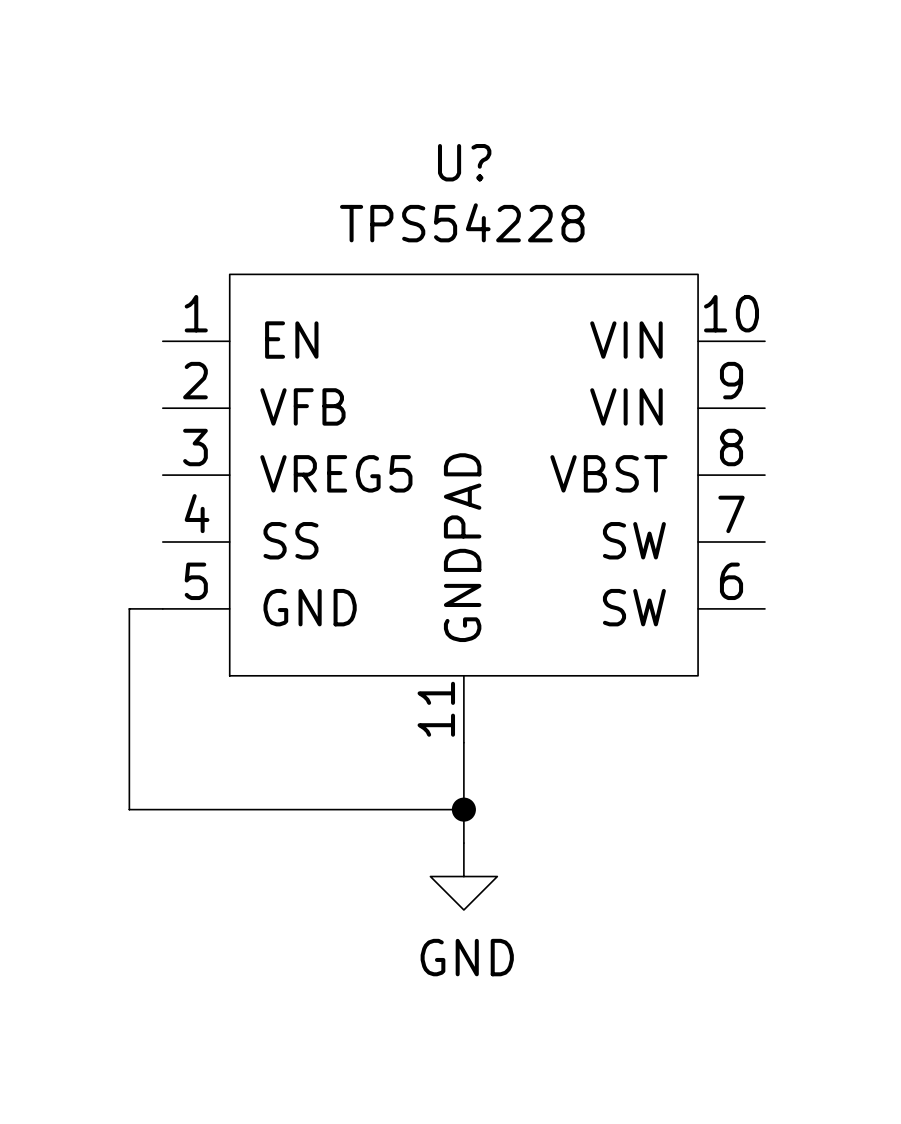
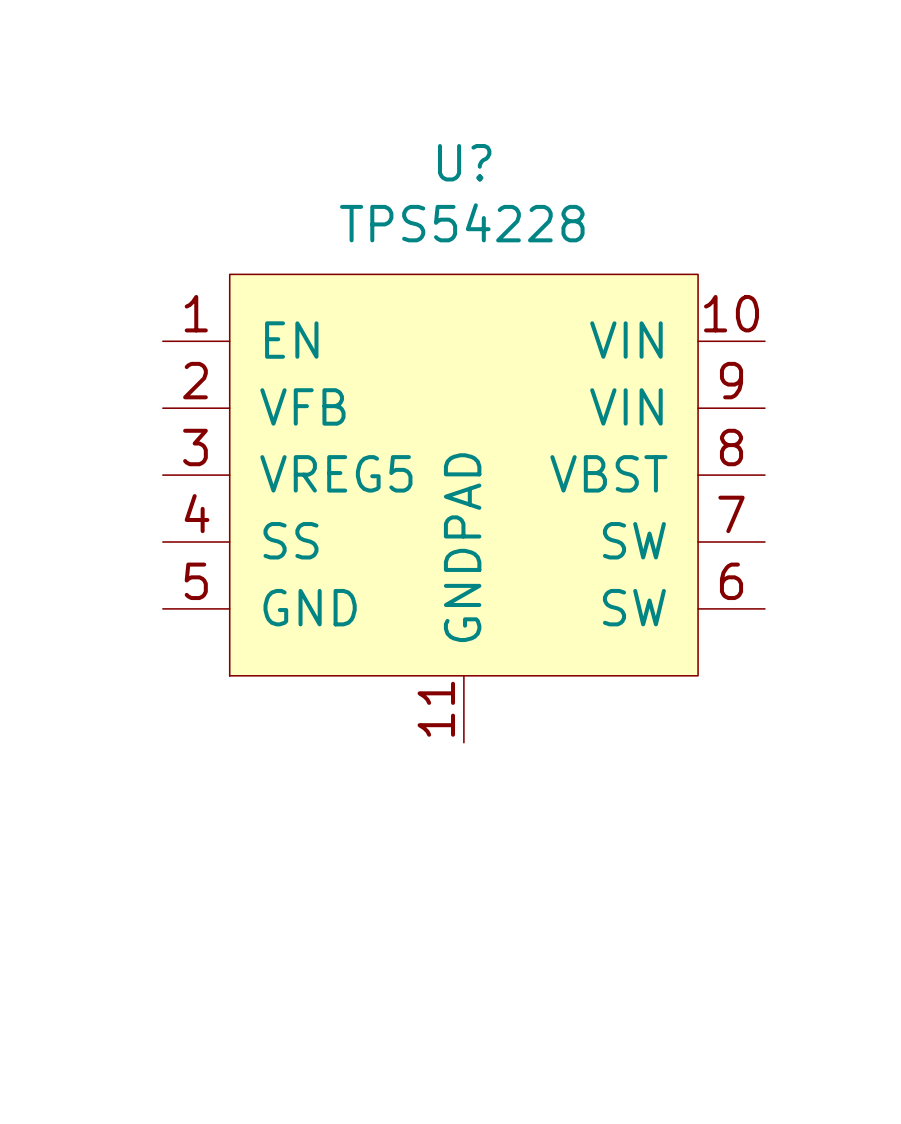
wire: (162, 608) (129, 608) (129, 809) (463, 809) -> none
wire: (463, 742) (463, 843) -> none
junction: (463, 809) -> none
power symbol: GND (463, 876) -> none

